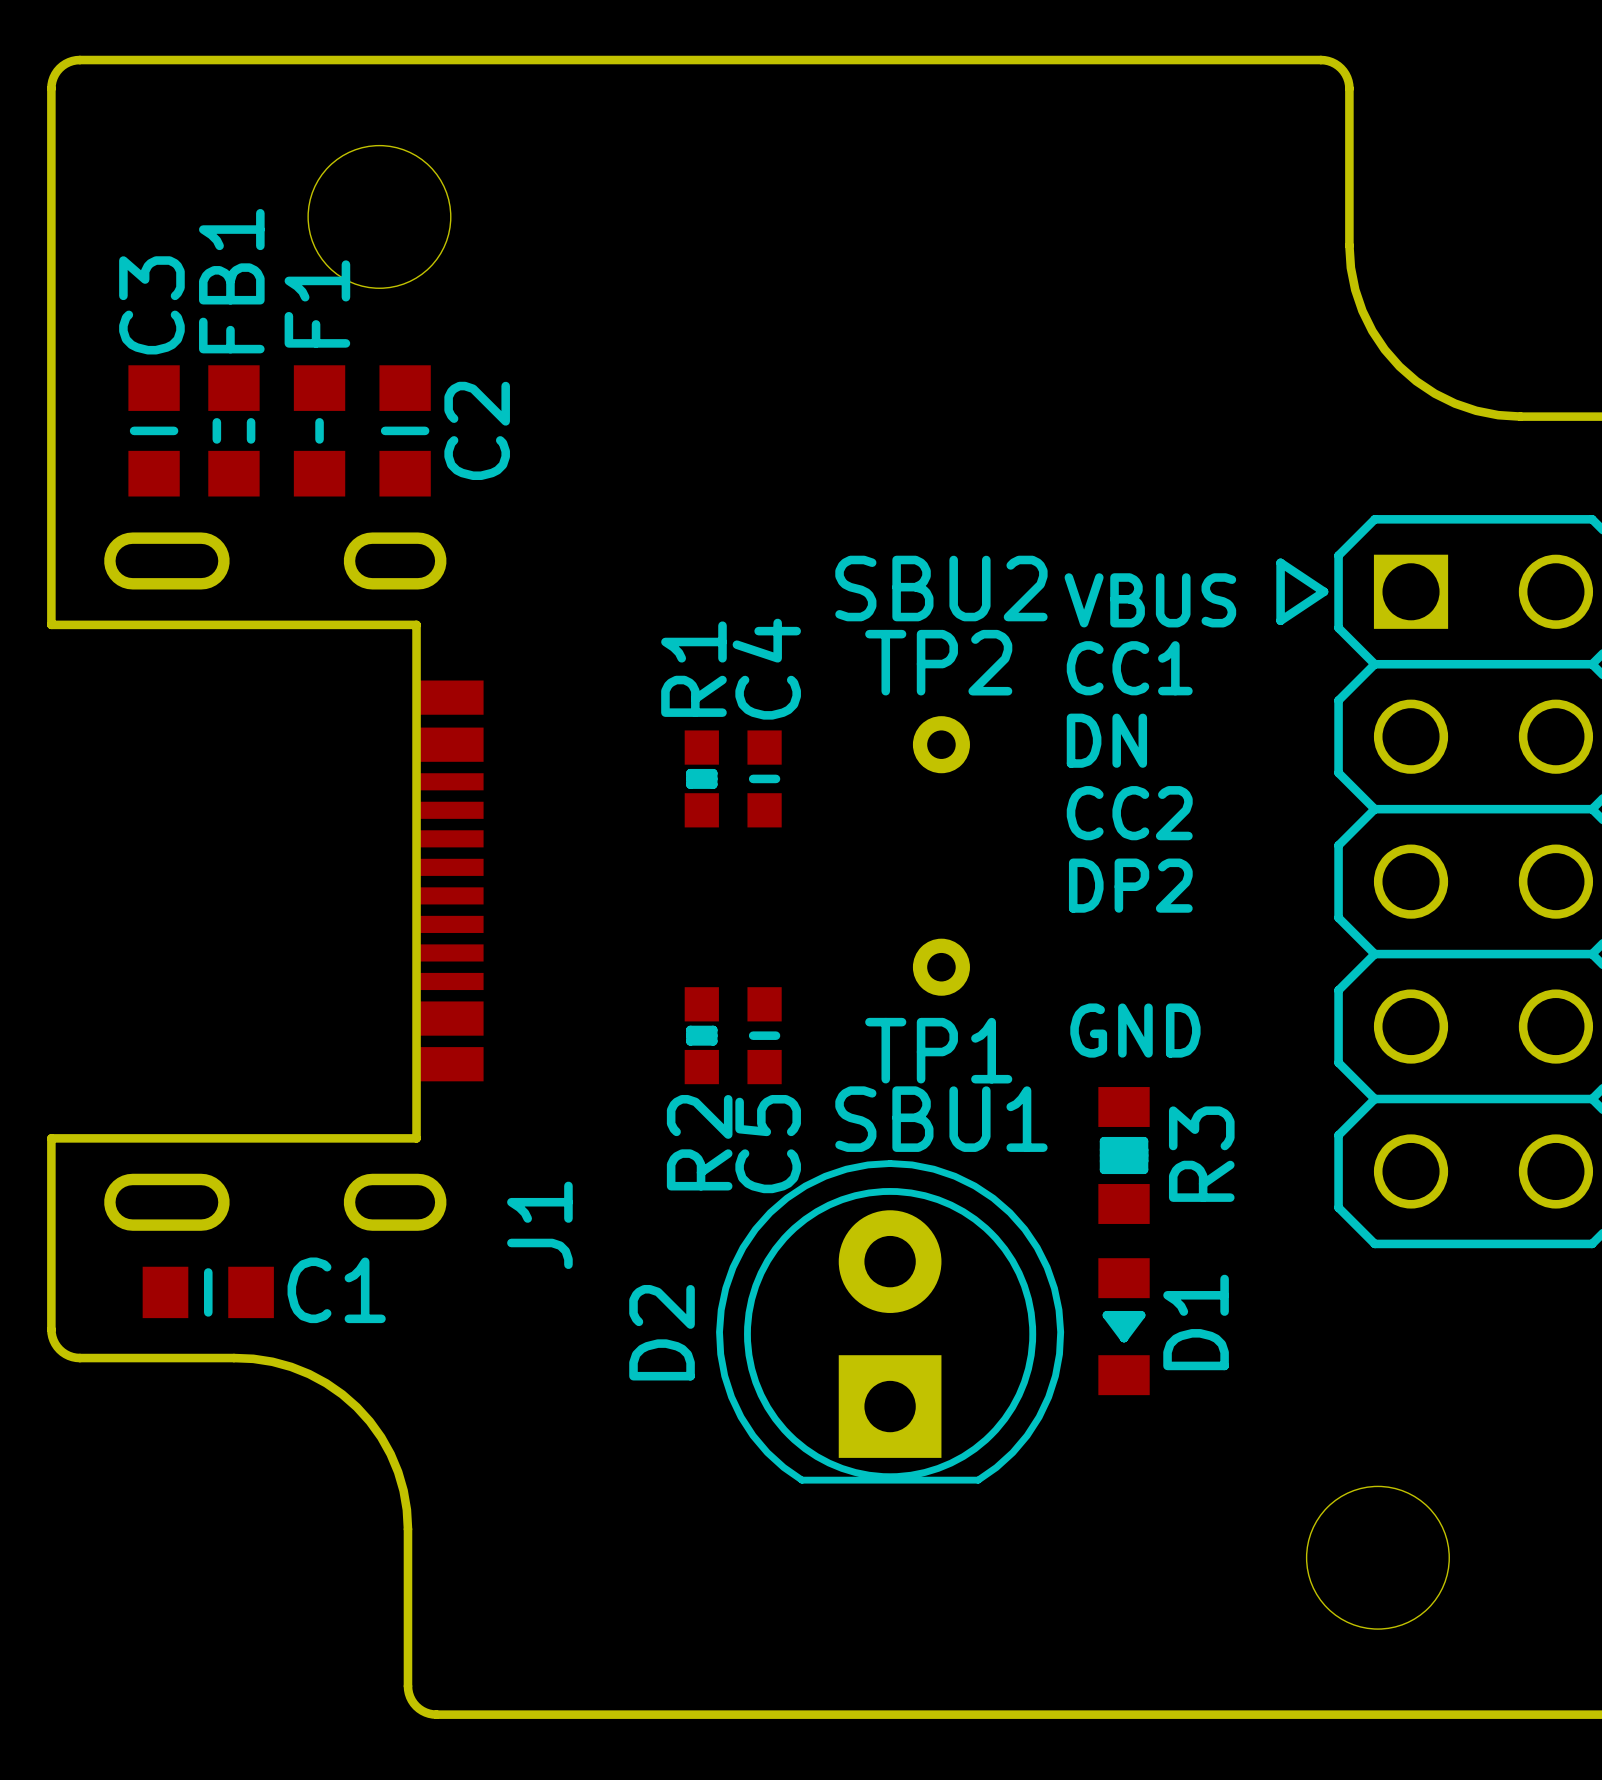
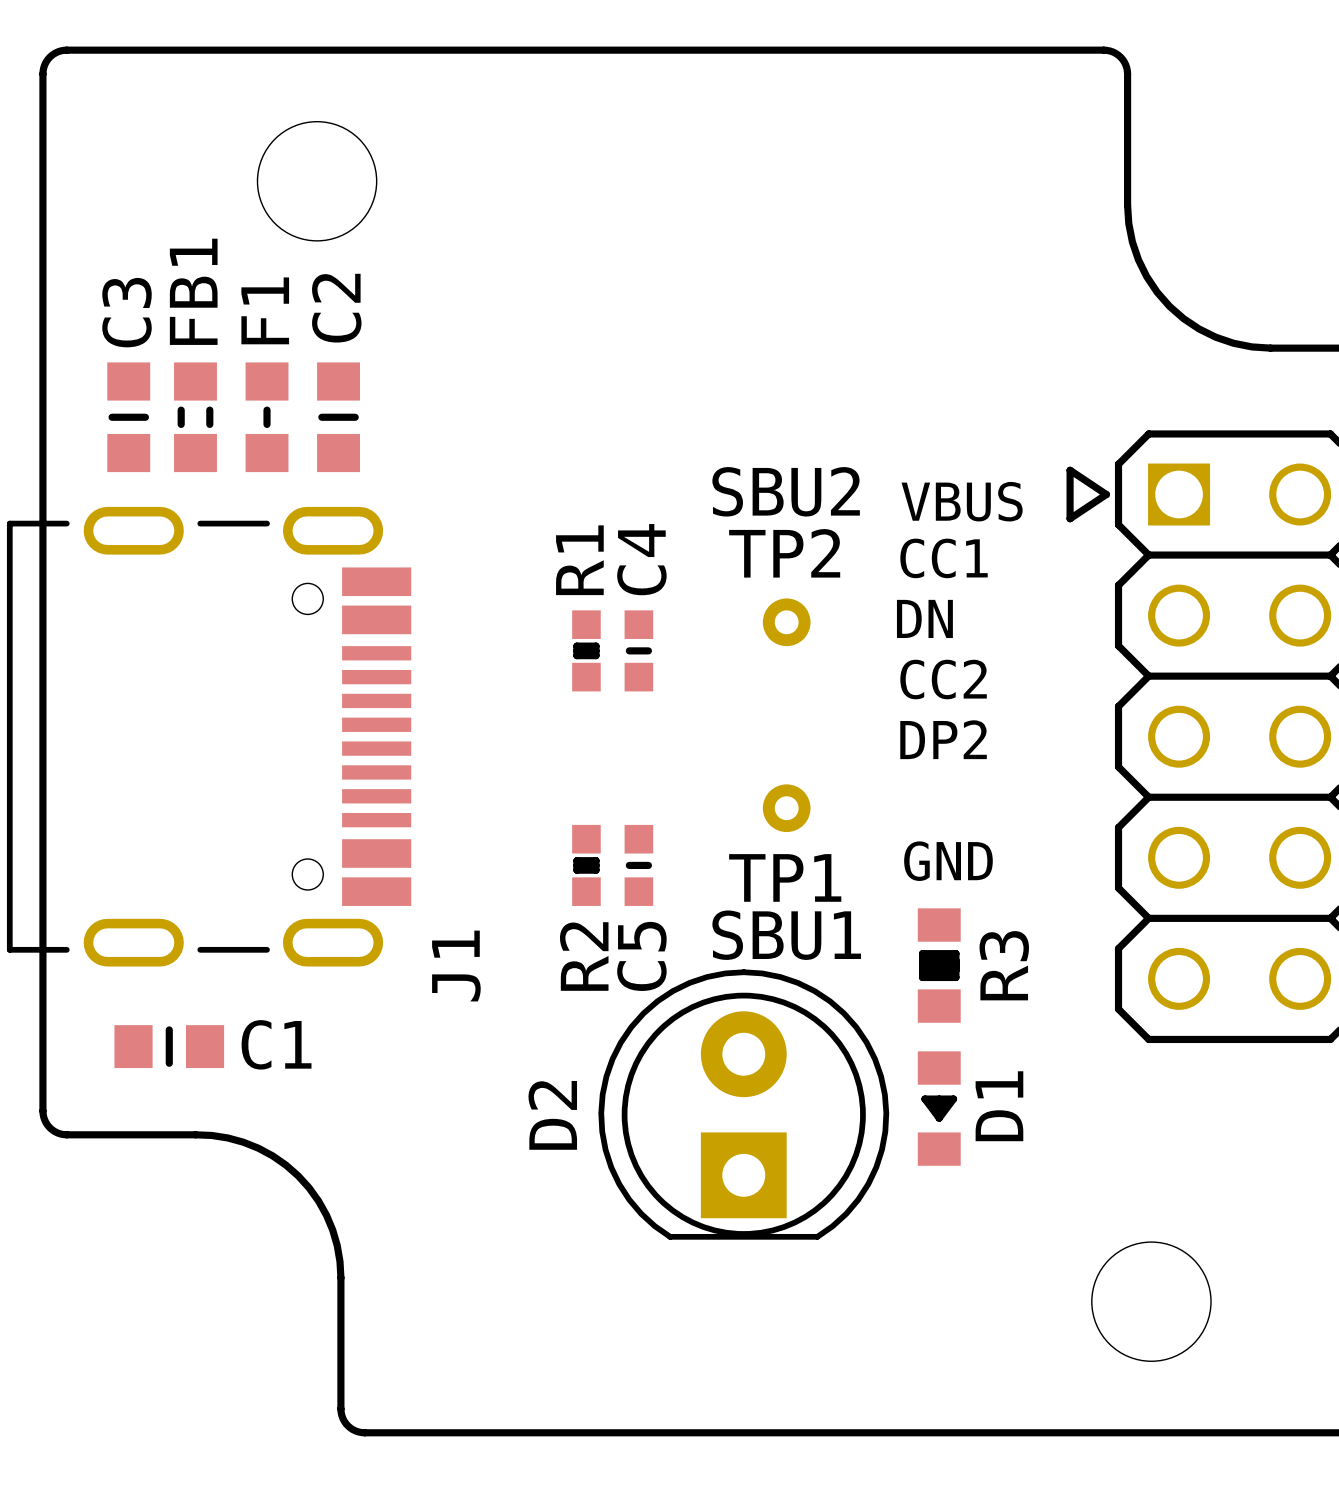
C3 position: (154, 430) -> (128, 417)
FB1 position: (233, 430) -> (195, 417)
F1 position: (319, 430) -> (267, 417)
C2 position: (405, 430) -> (338, 417)
C2 name position: C2 (477, 430) -> C2 (336, 308)
J1 footprint: [104, 532, 484, 1231] -> [6, 506, 412, 967]
board edge: (51, 624) (416, 624) (416, 1138) (51, 1138) -> (42, 522) (42, 951)
C1 position: (208, 1292) -> (169, 1046)

